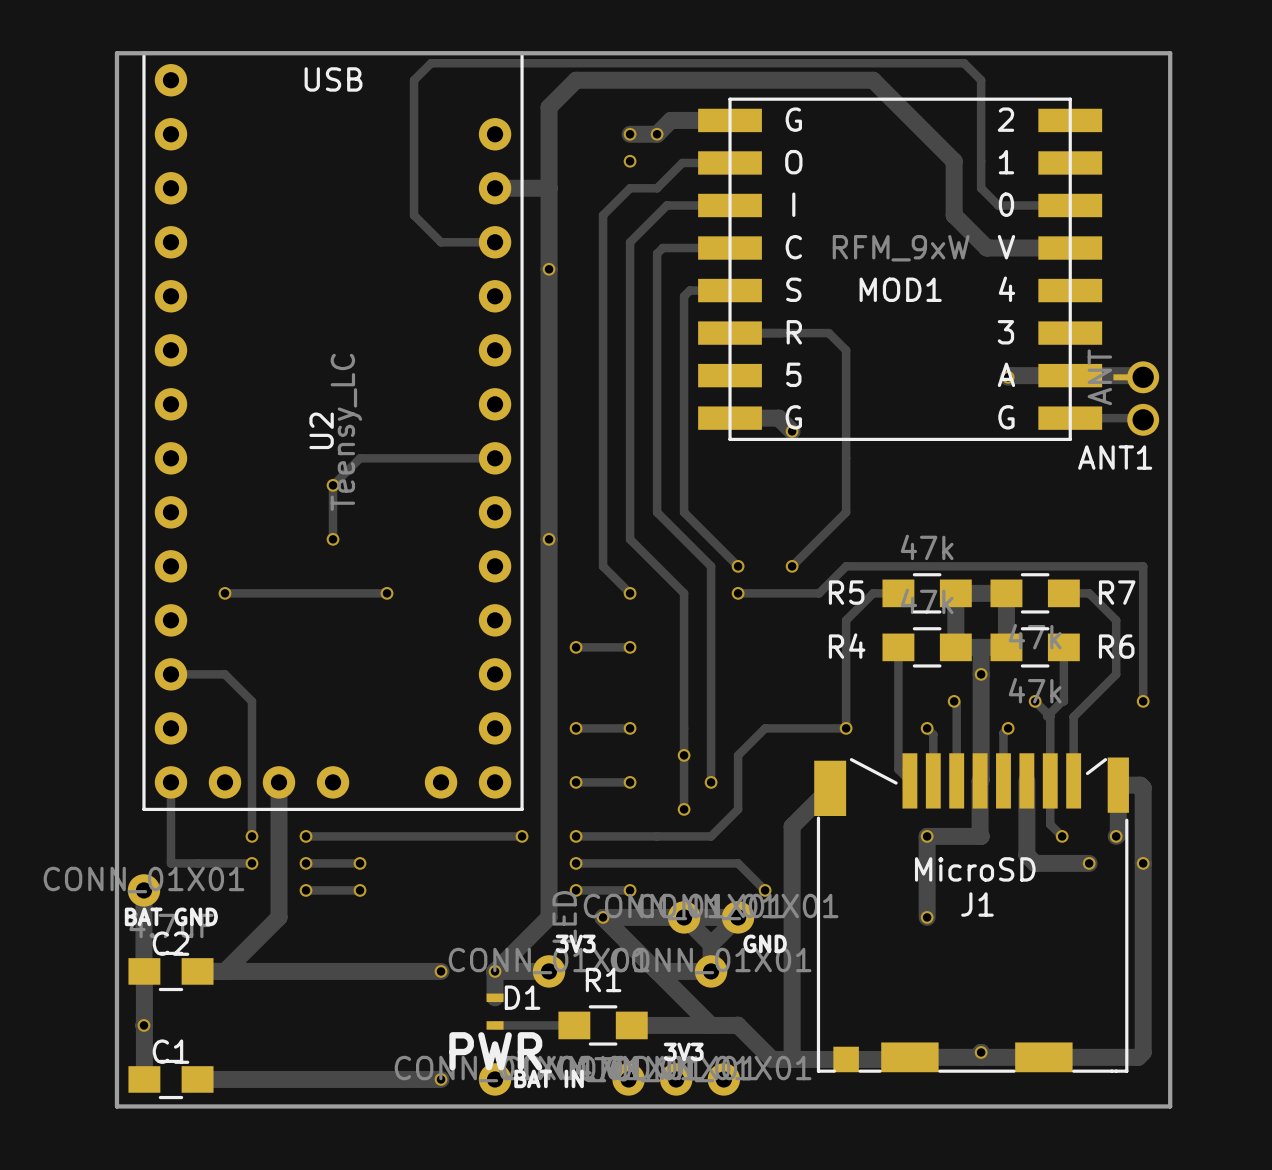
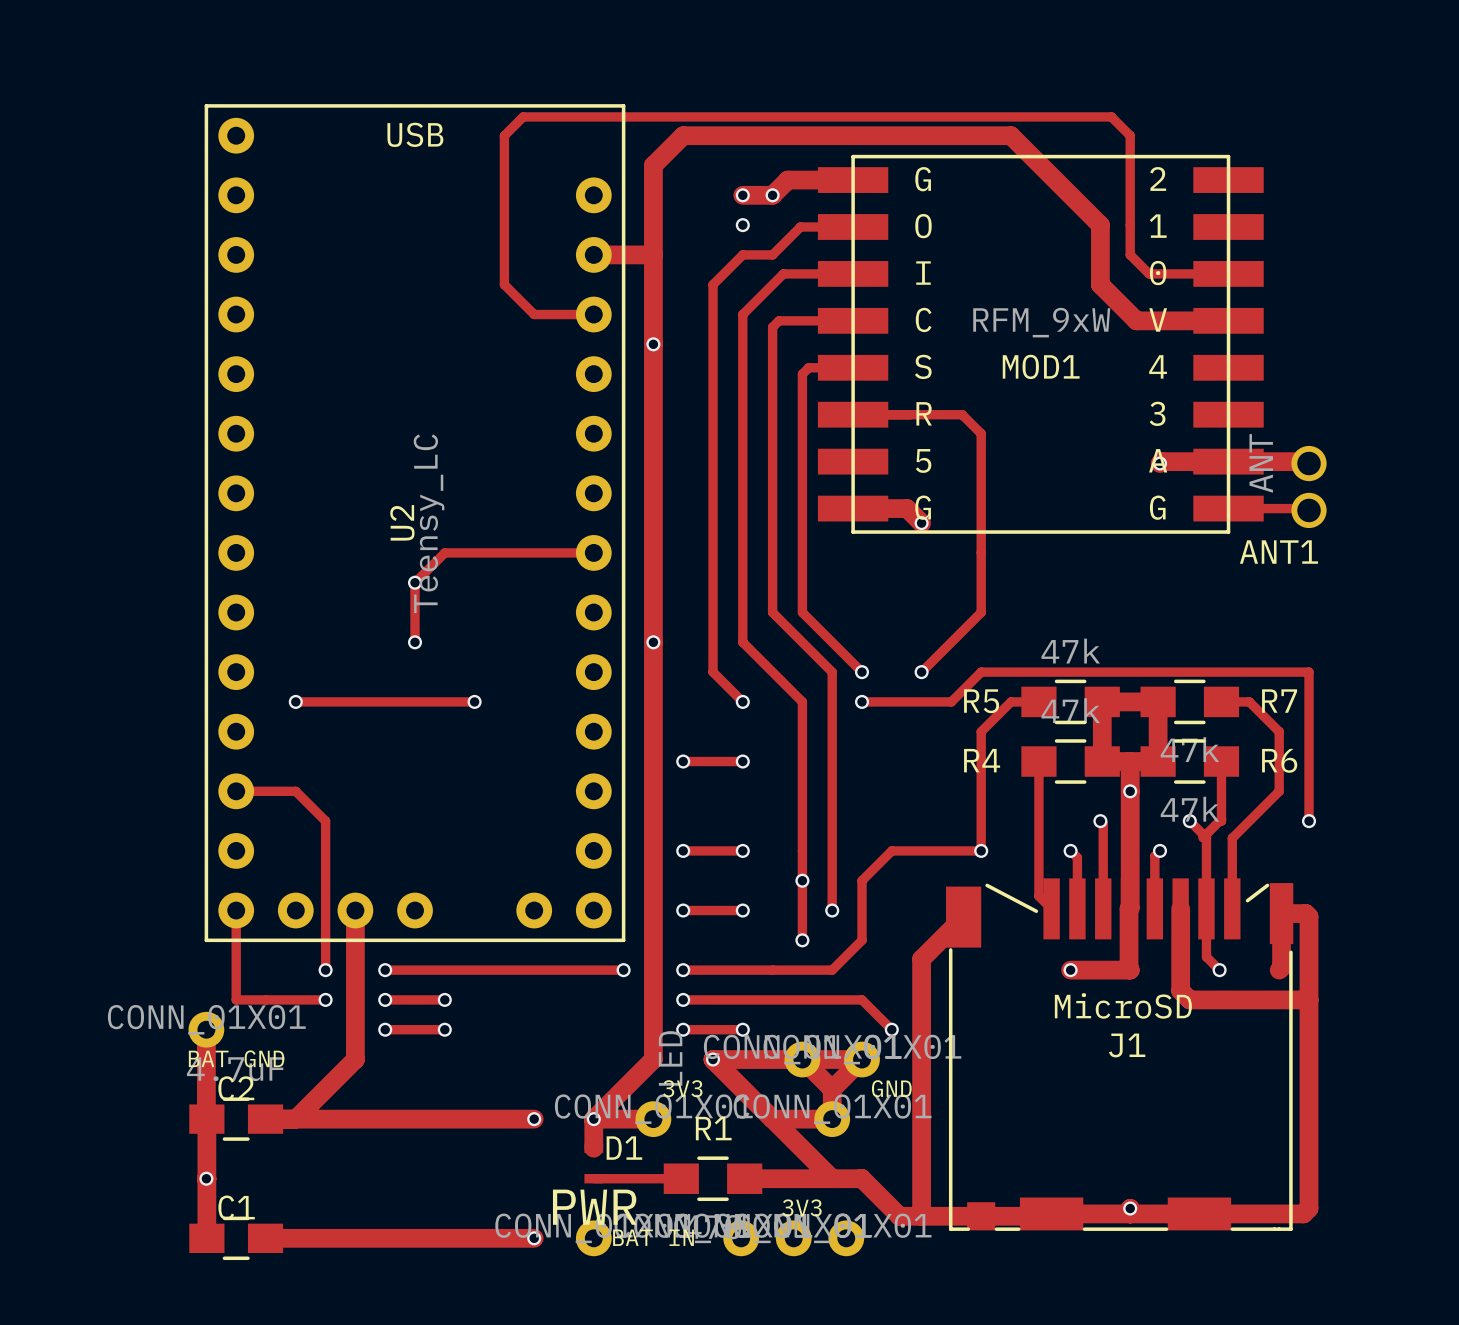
board edge: (116, 53) (116, 1106) (1170, 1106) (1170, 53) (116, 53) -> none
track: (927, 836) (927, 917) -> none
via: (1116, 836) -> none
track: none -> (1249, 999) (1309, 999)
via: (1089, 863) -> none
via: (1143, 863) -> none
via: (927, 917) -> none

